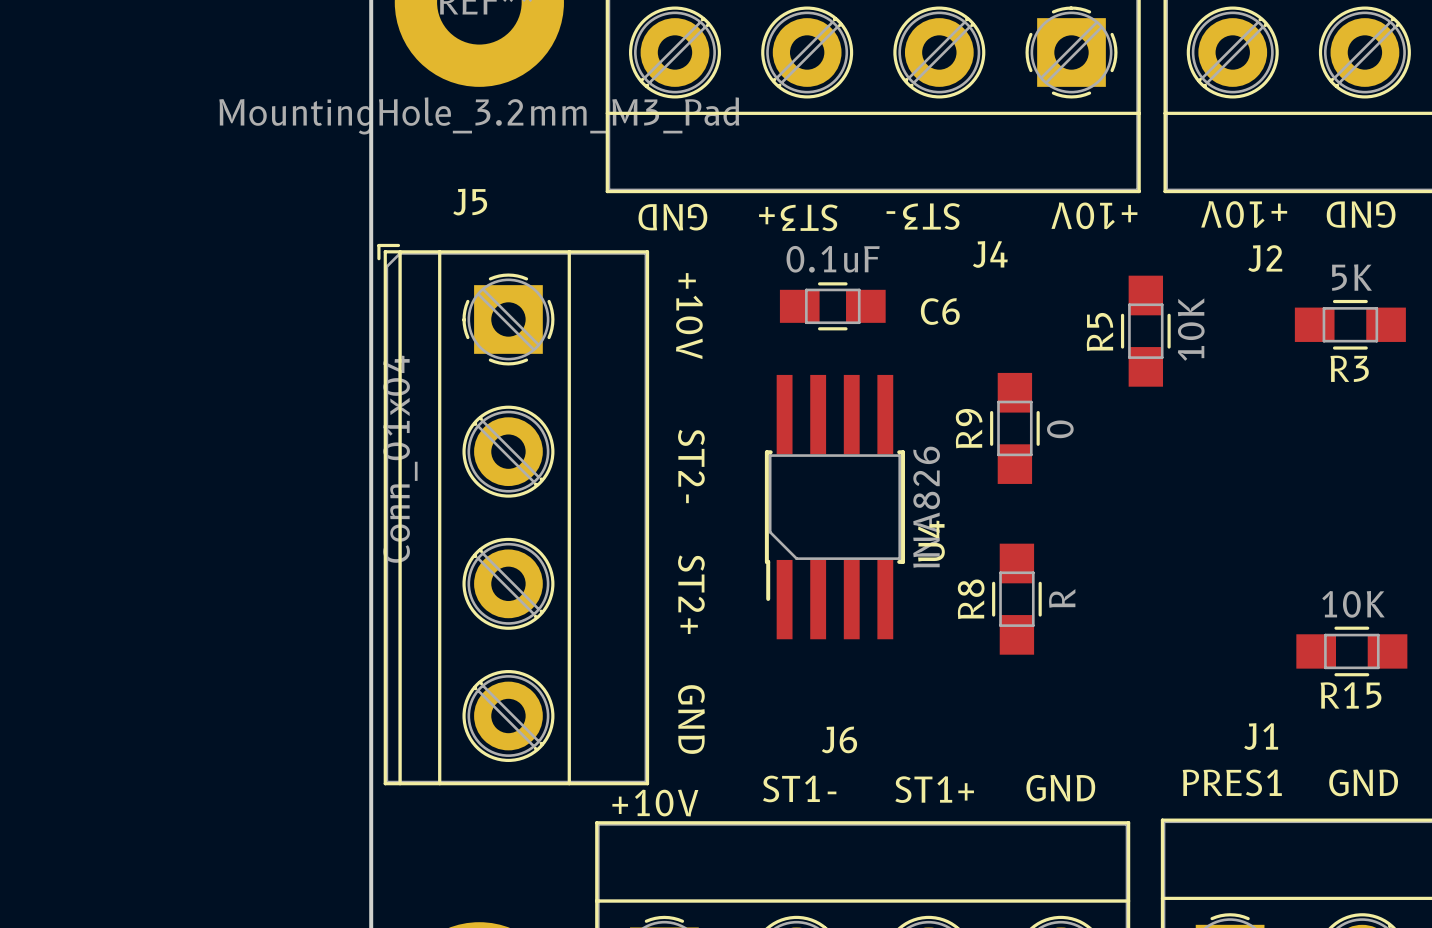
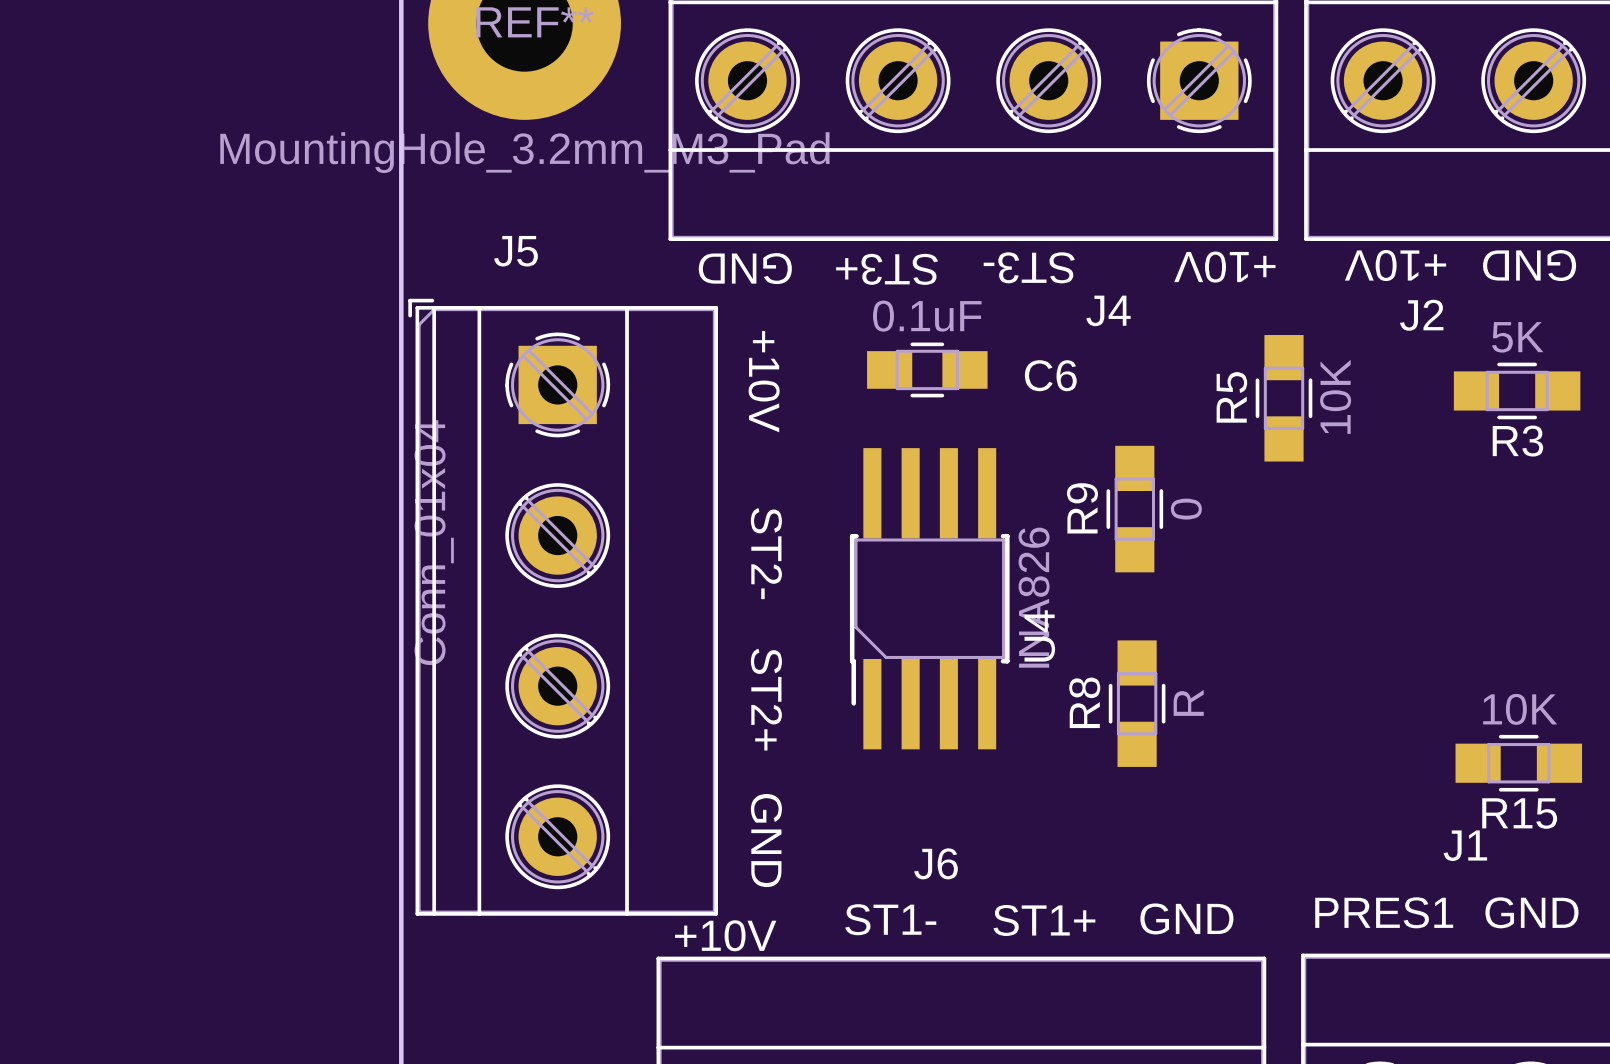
J1 name position: J1 (1261, 736) -> J1 (1465, 845)

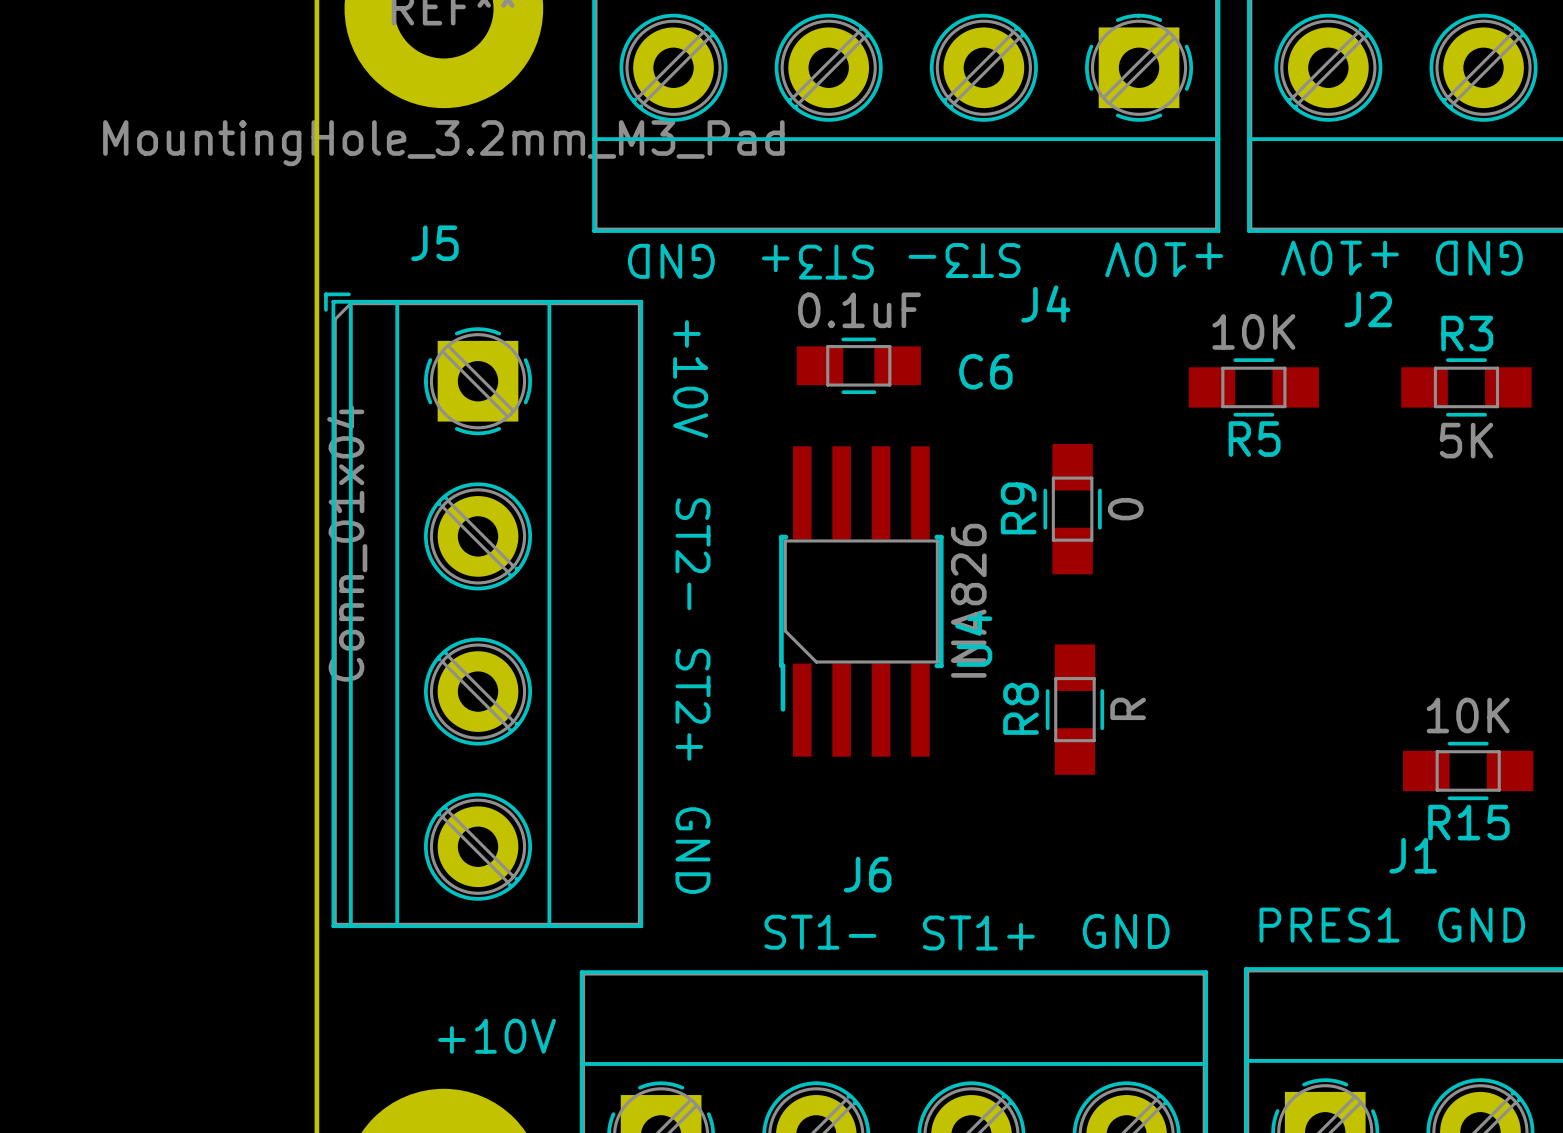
R3 value position: 5K (1517, 337) -> 5K (1466, 440)
R5 value position: 10K (1335, 396) -> 10K (1253, 331)
R5 name position: R5 (1231, 397) -> R5 (1254, 439)
R5 rotation: 0° (1284, 398) -> 90° clockwise (1253, 387)
R3 name position: R3 (1517, 441) -> R3 (1467, 333)
text position: +10V (725, 935) -> +10V (497, 1036)

